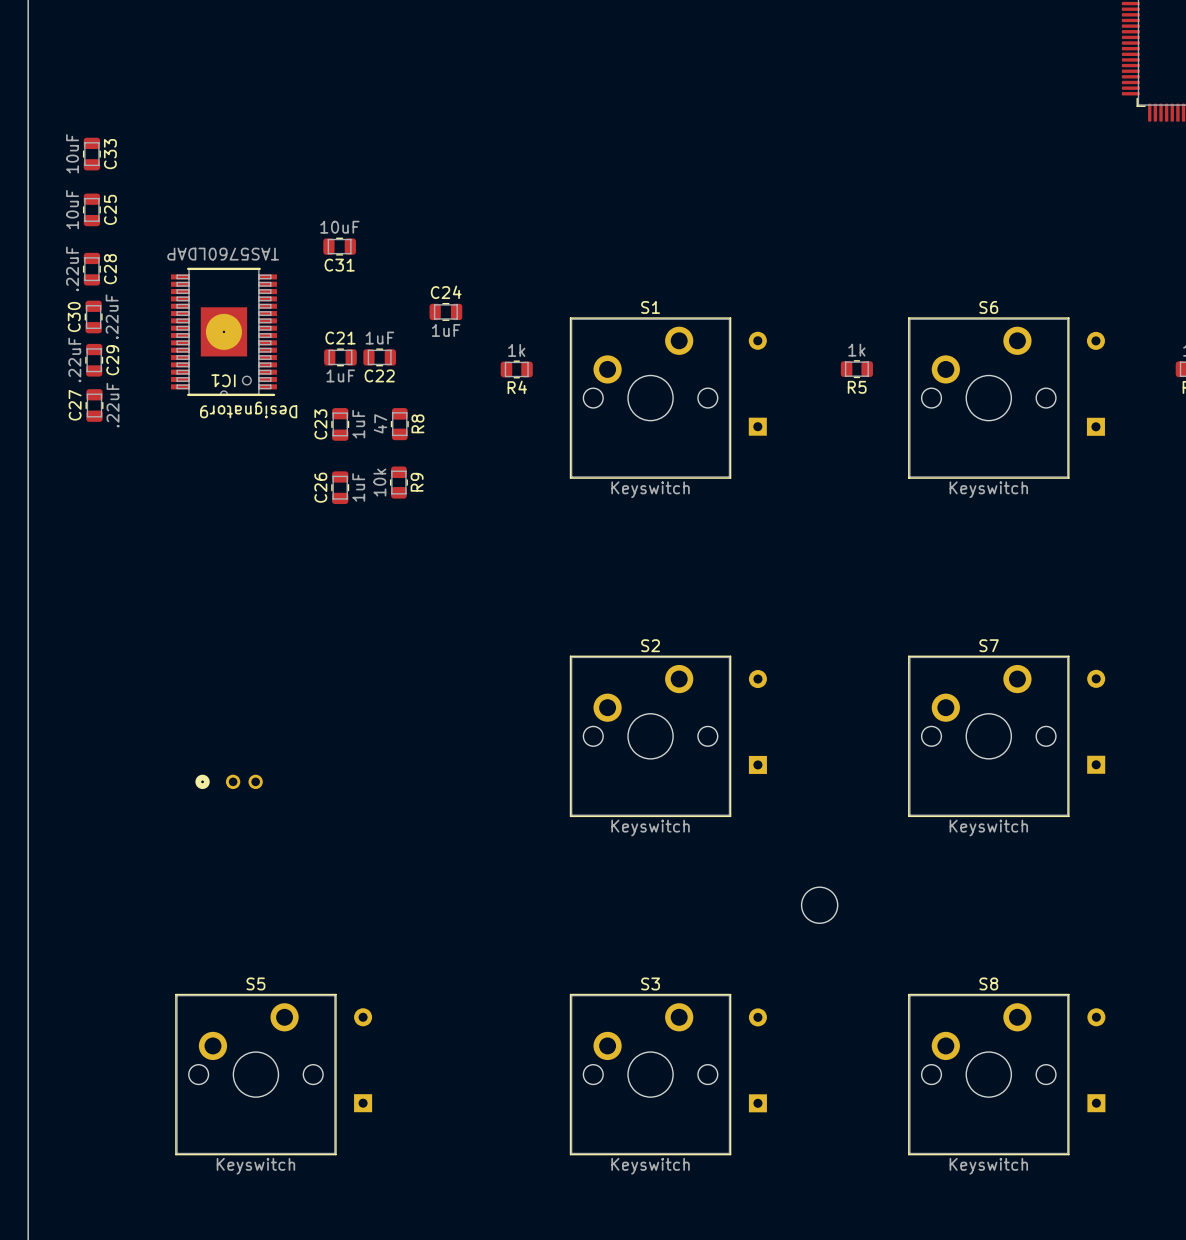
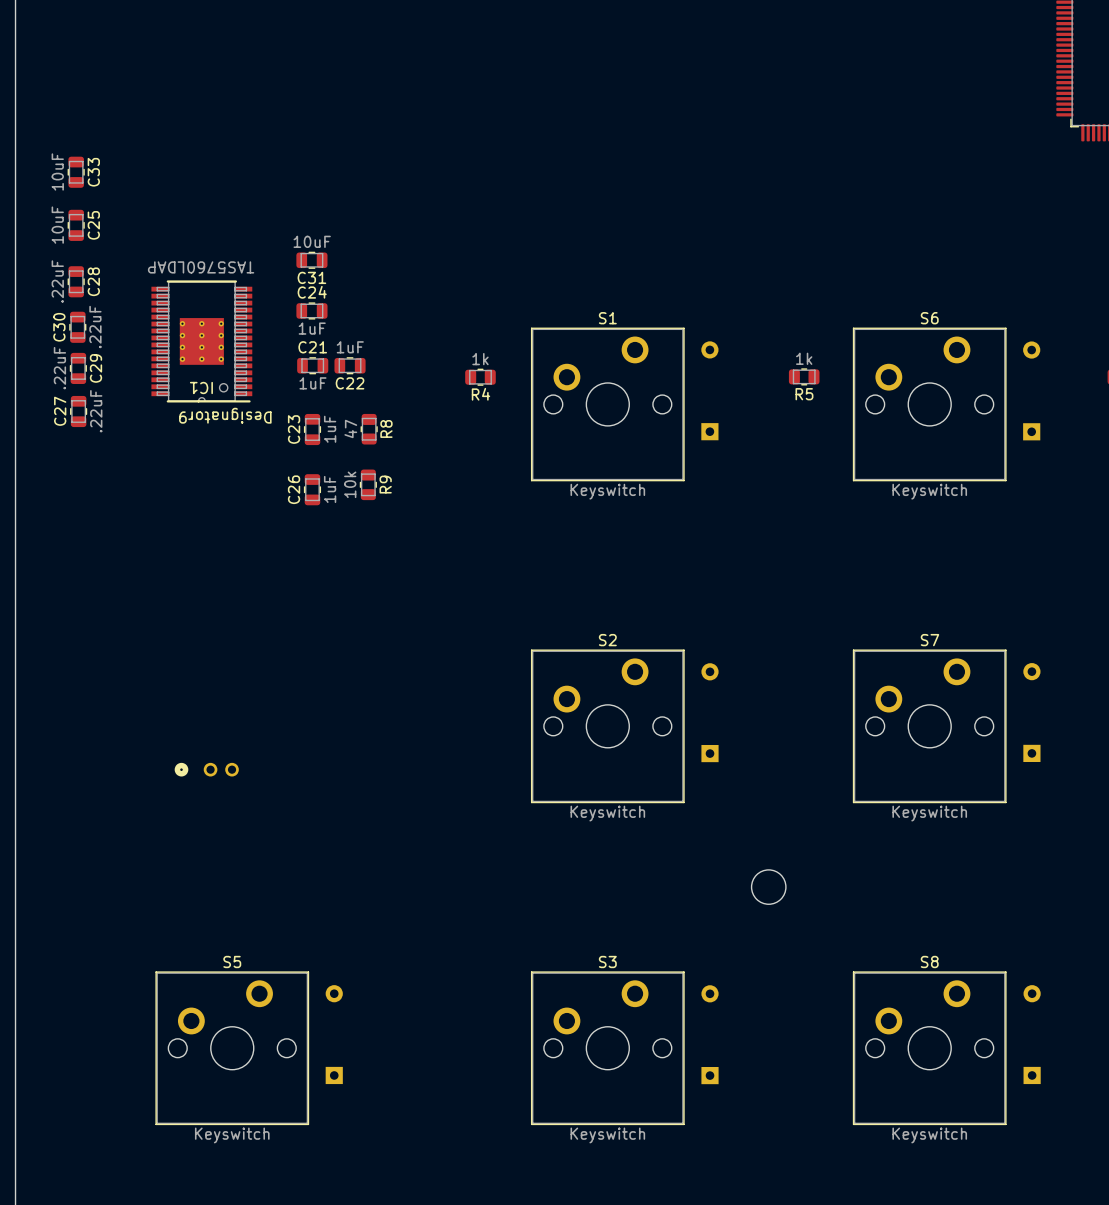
IC1 footprint: [170, 267, 277, 397] -> [151, 280, 253, 403]
C24 position: (445, 311) -> (311, 310)

